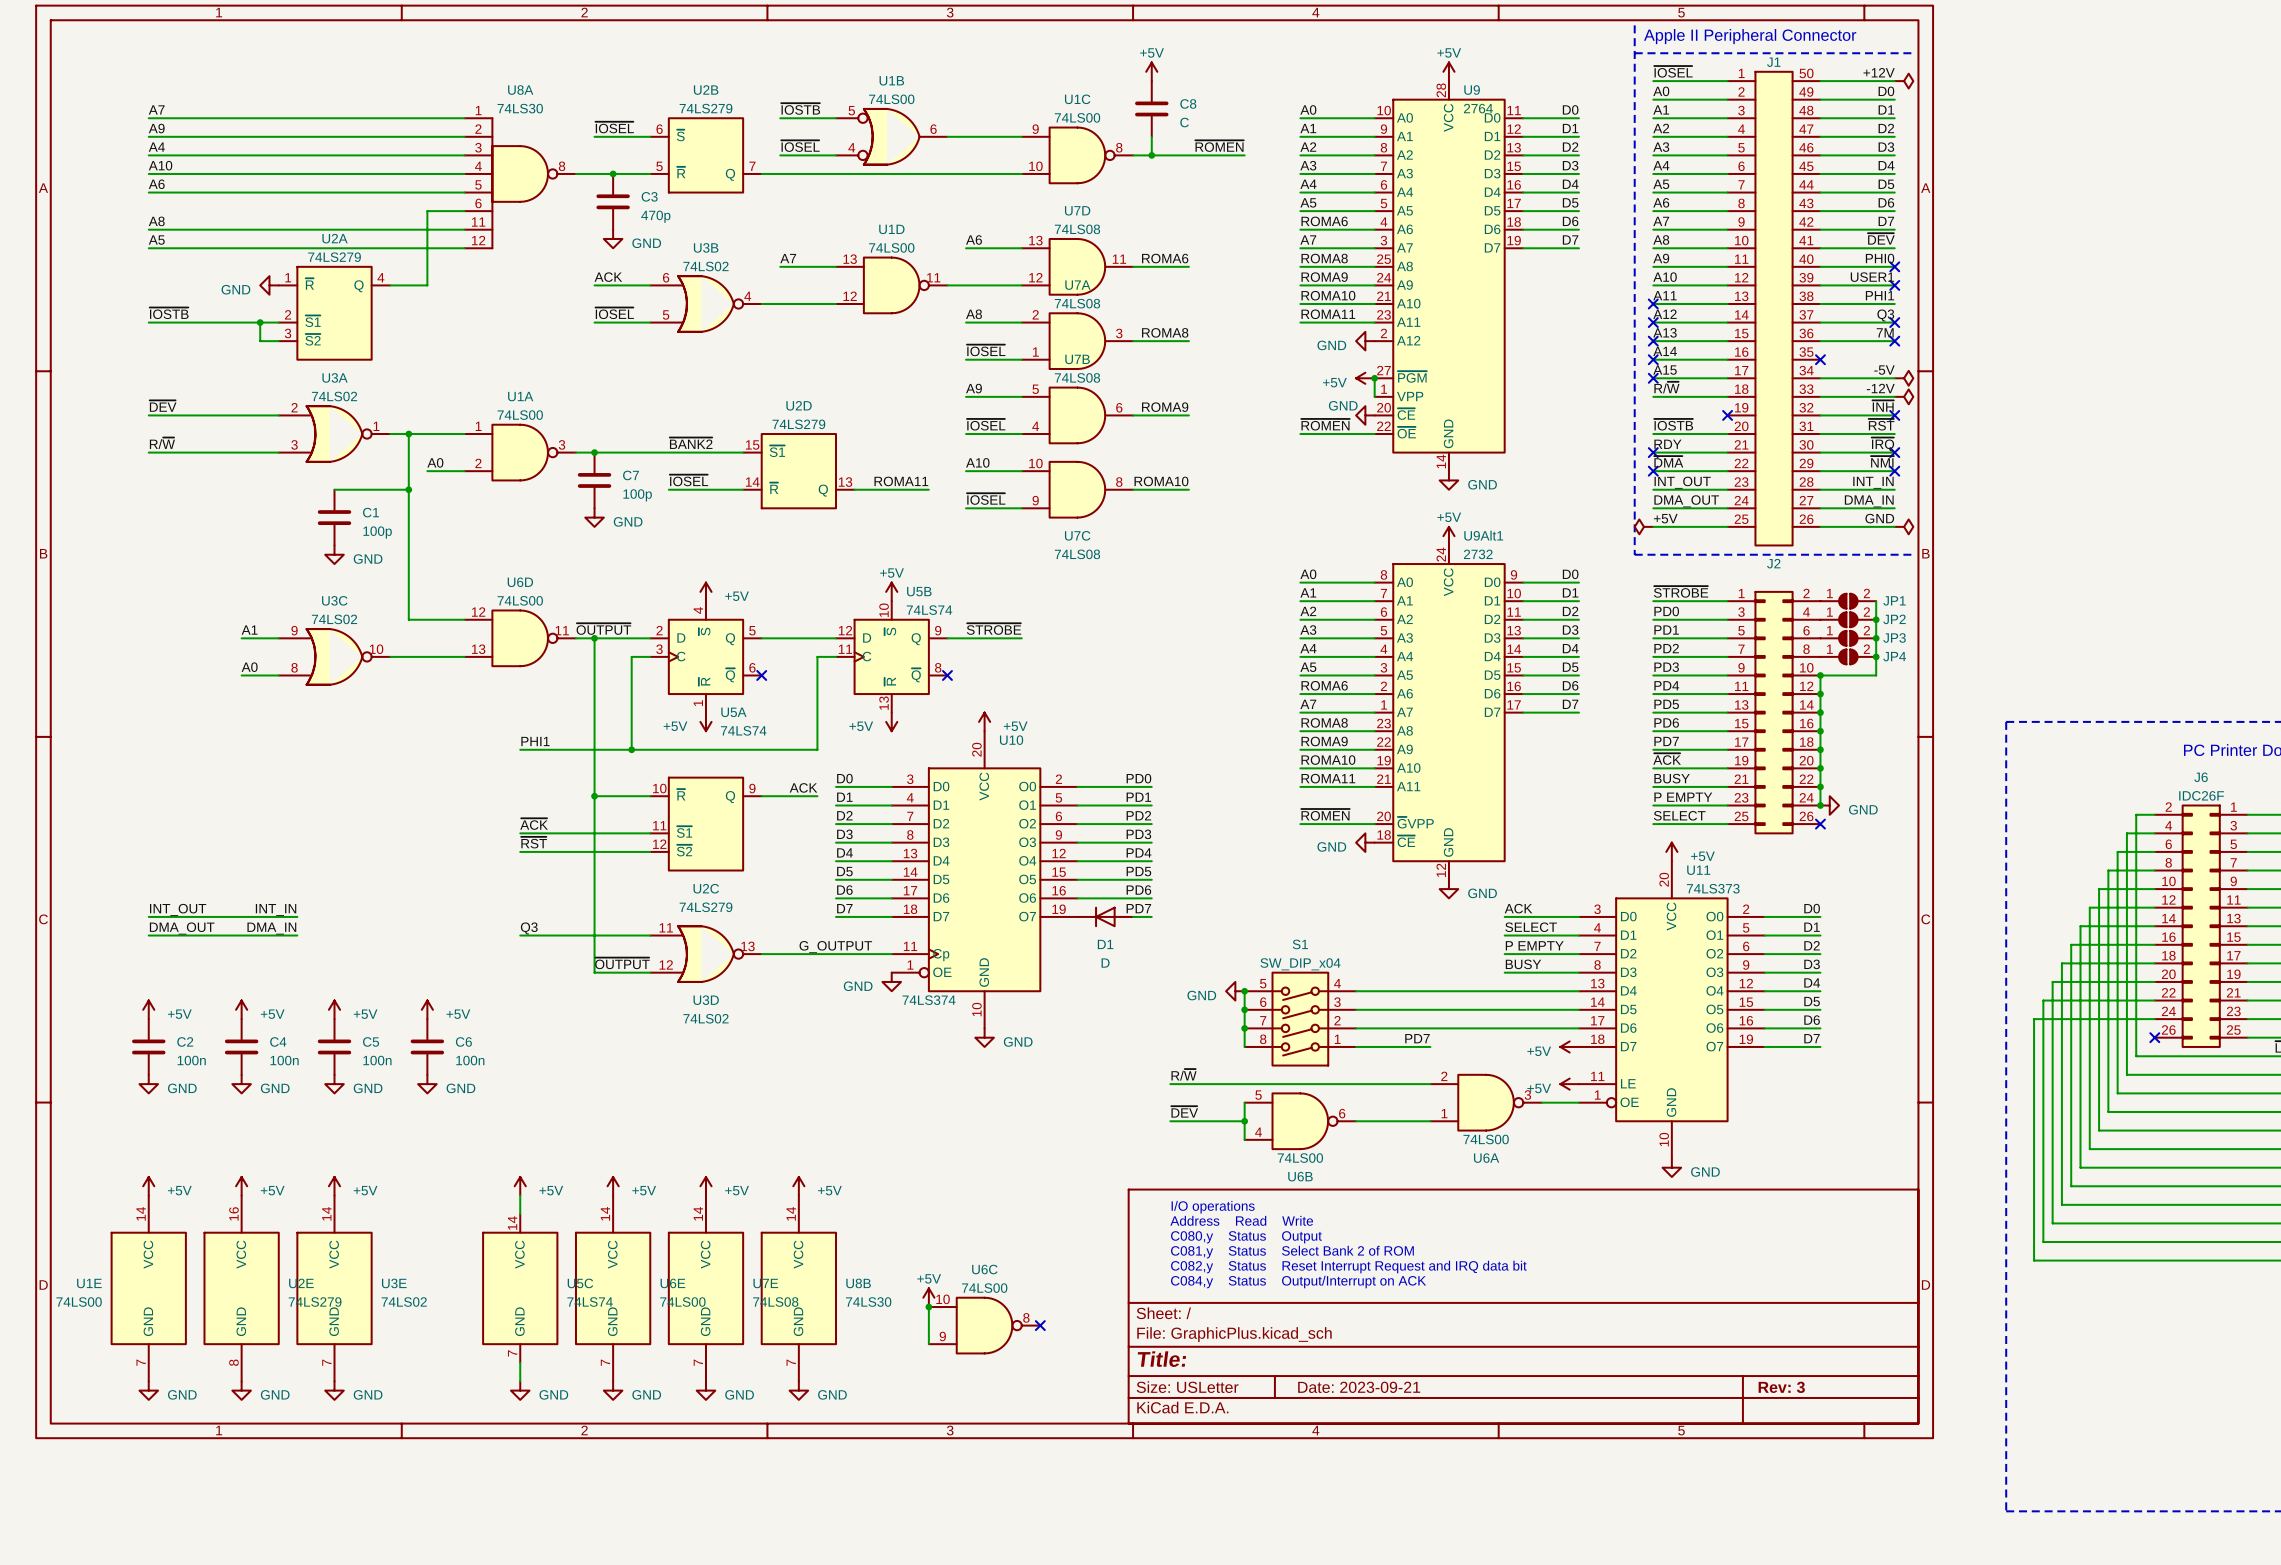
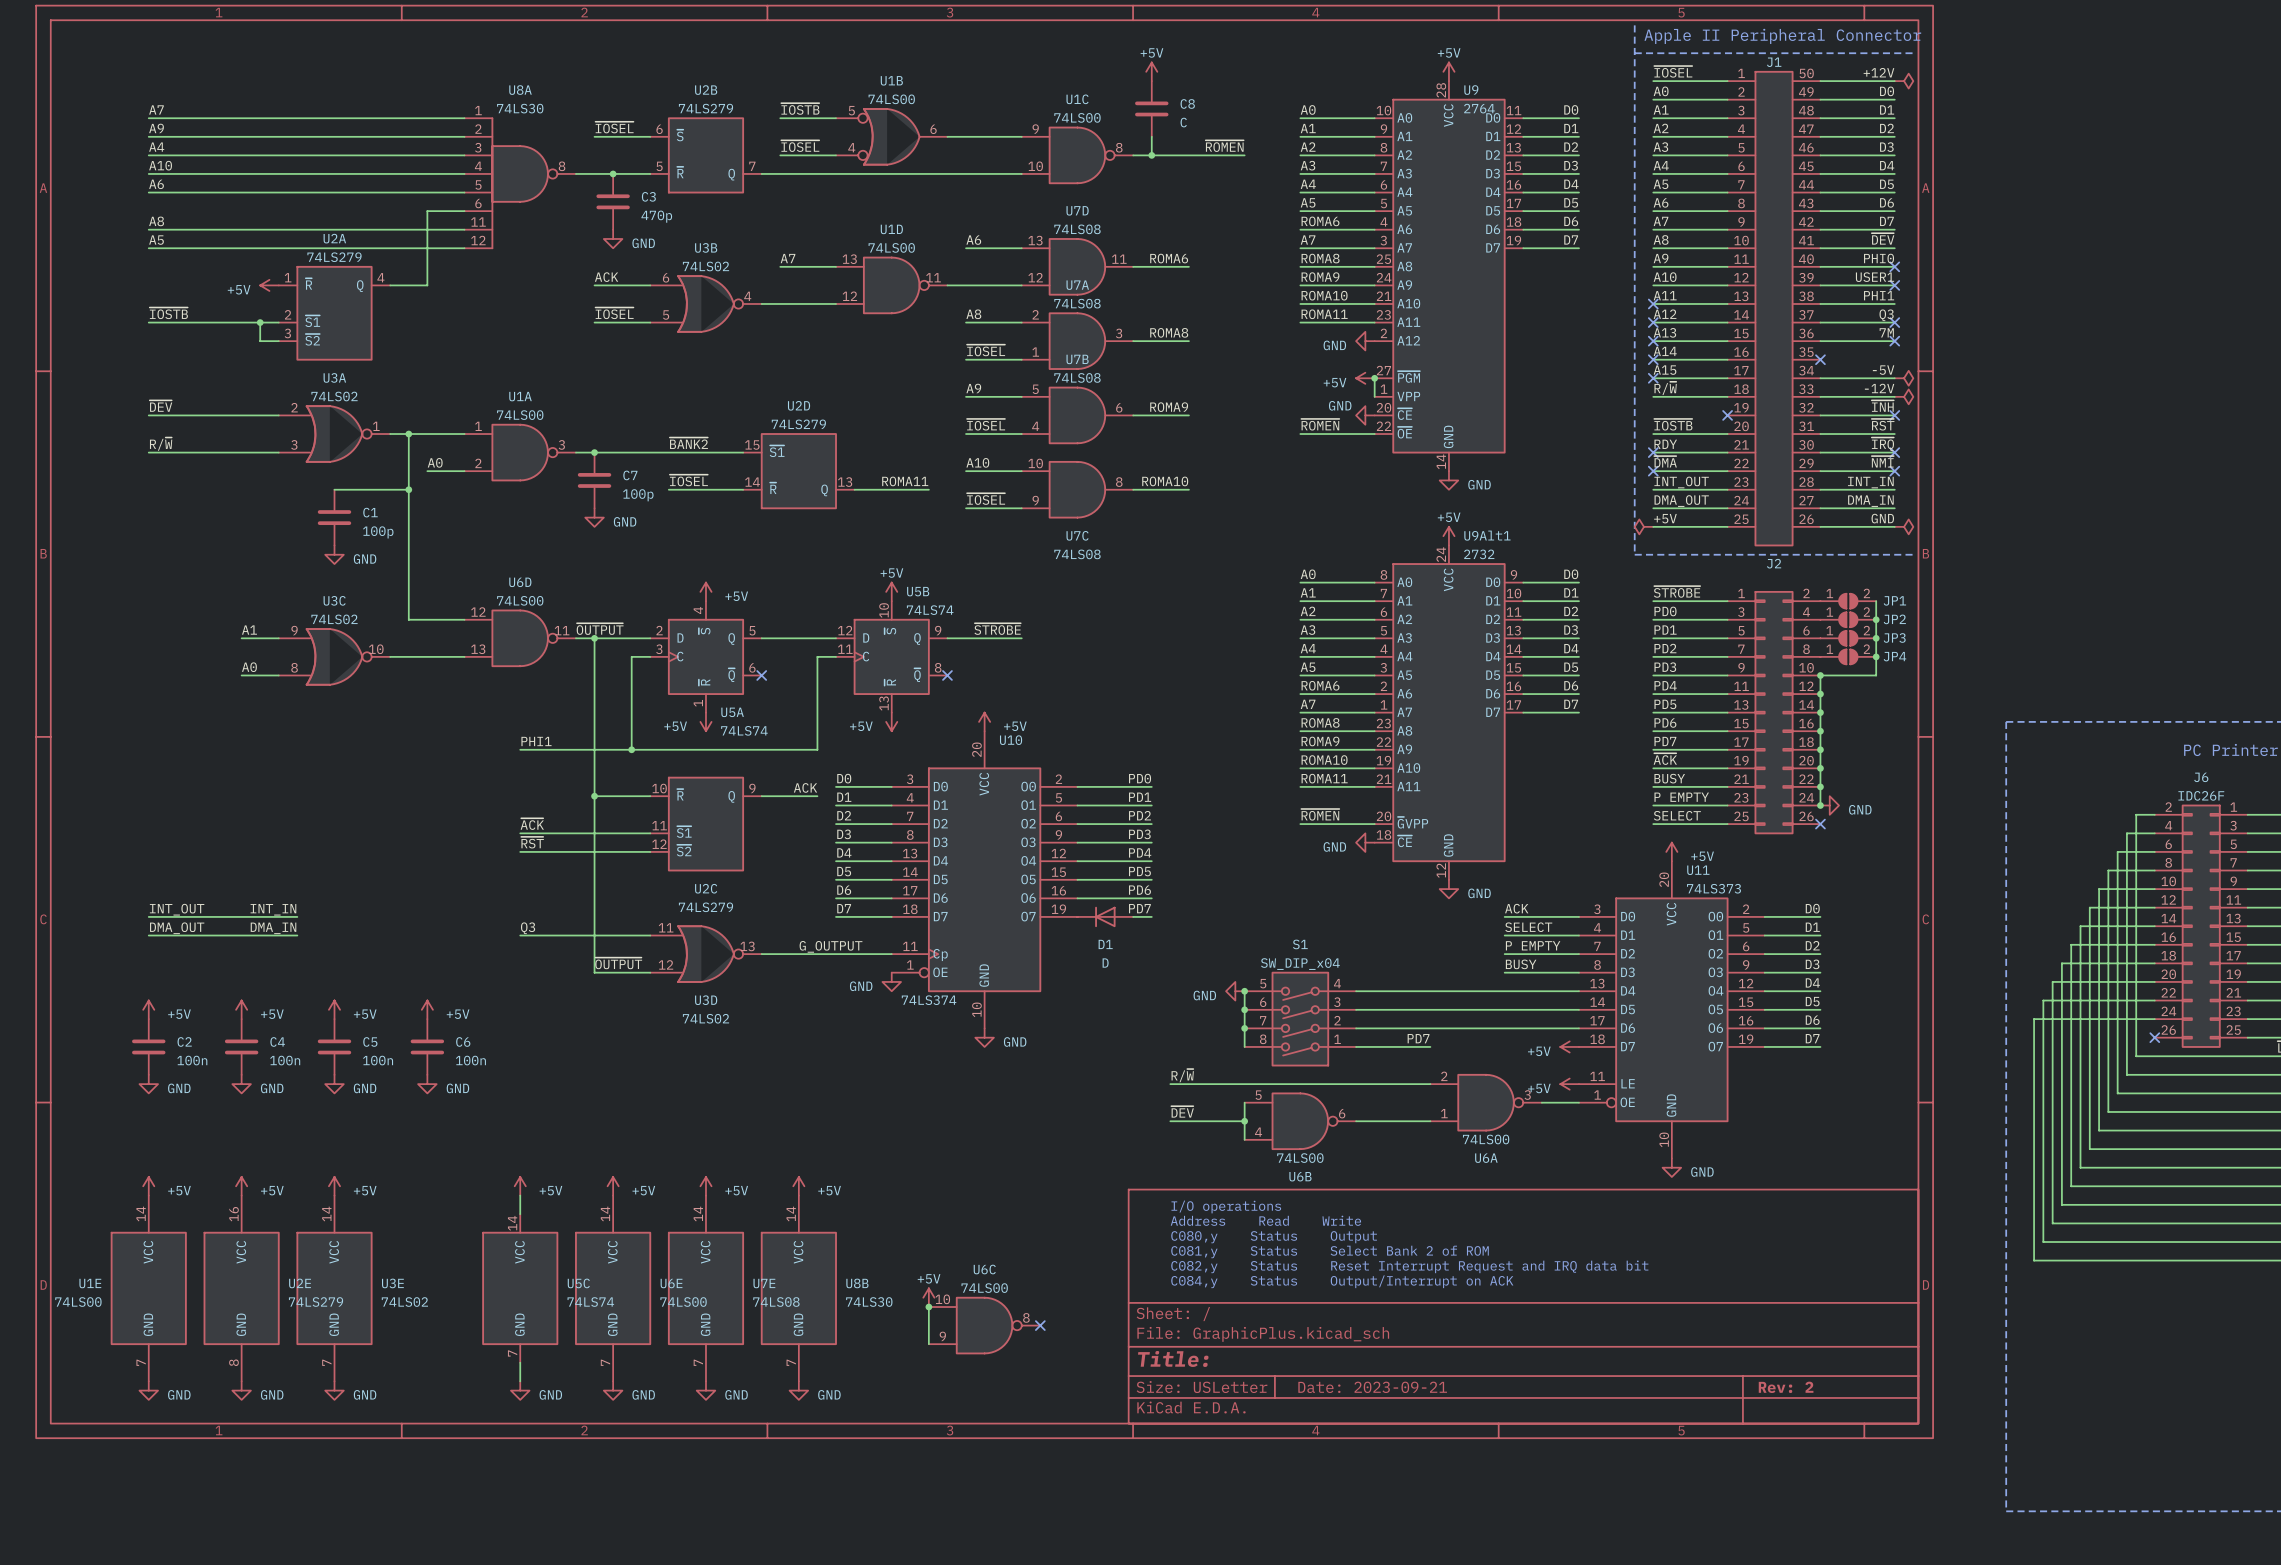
power symbol: GND (269, 285) -> +5V (269, 285)
title block: Rev: 3 (1781, 1387) -> Rev: 2 (1786, 1387)

